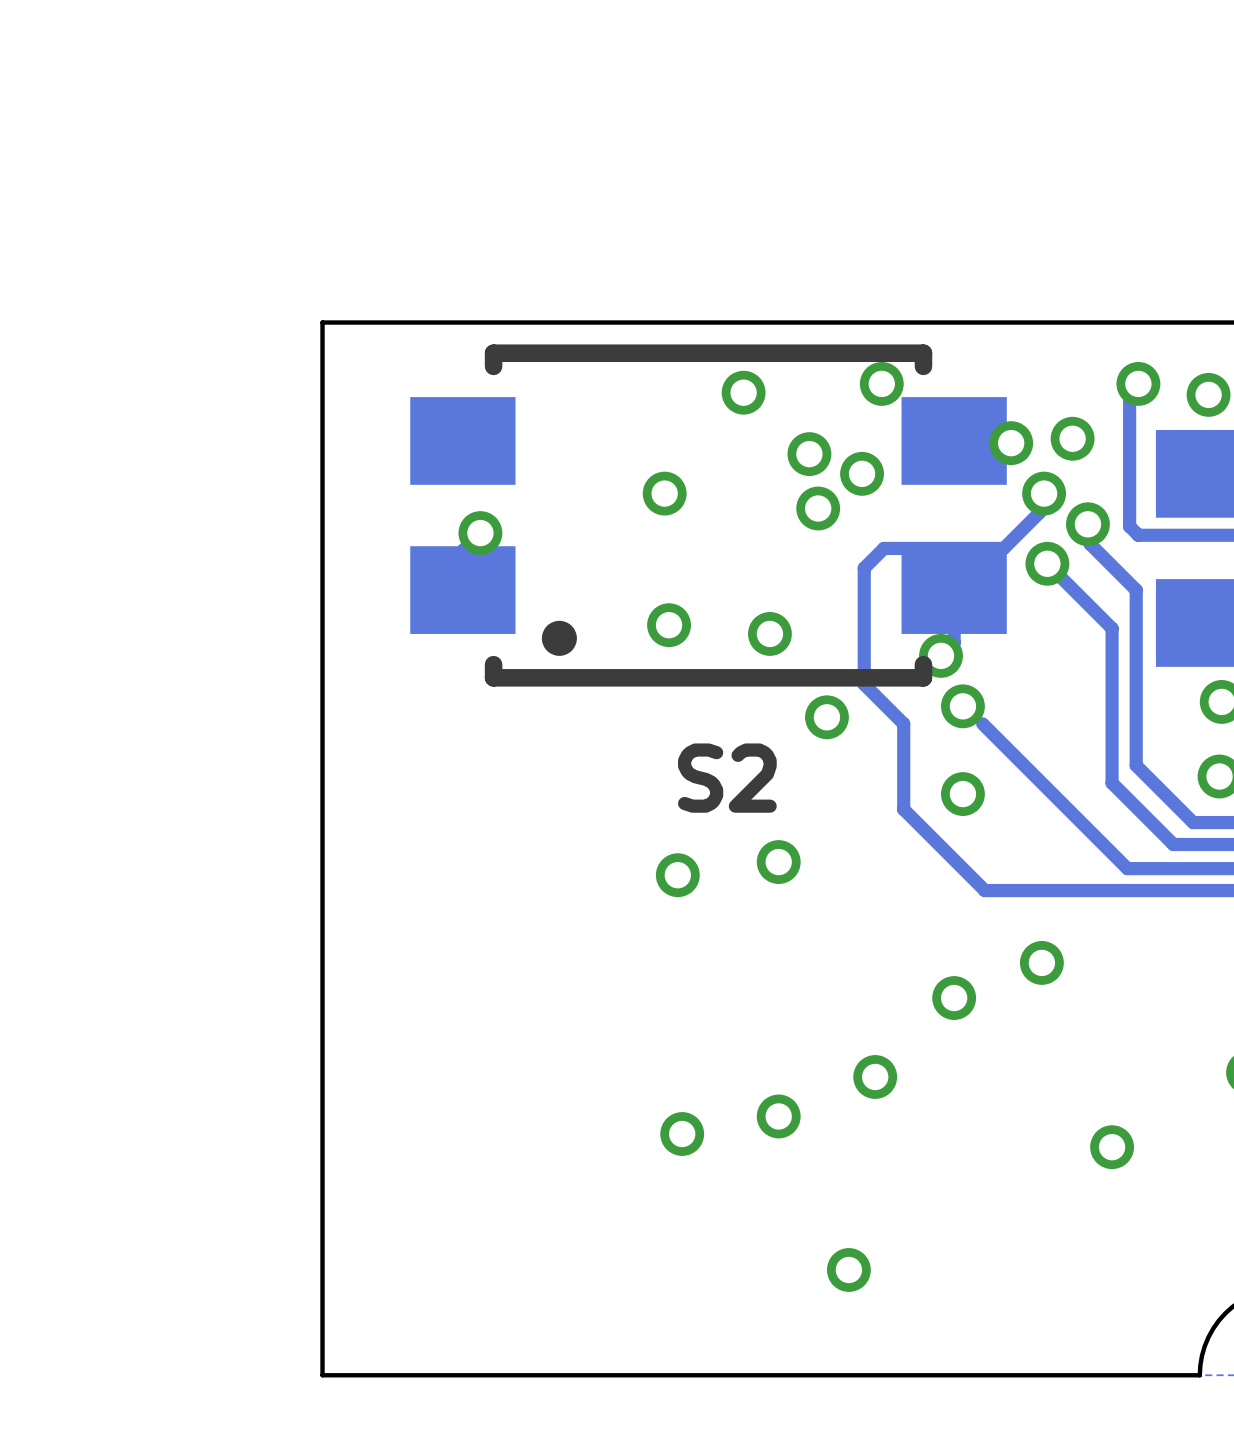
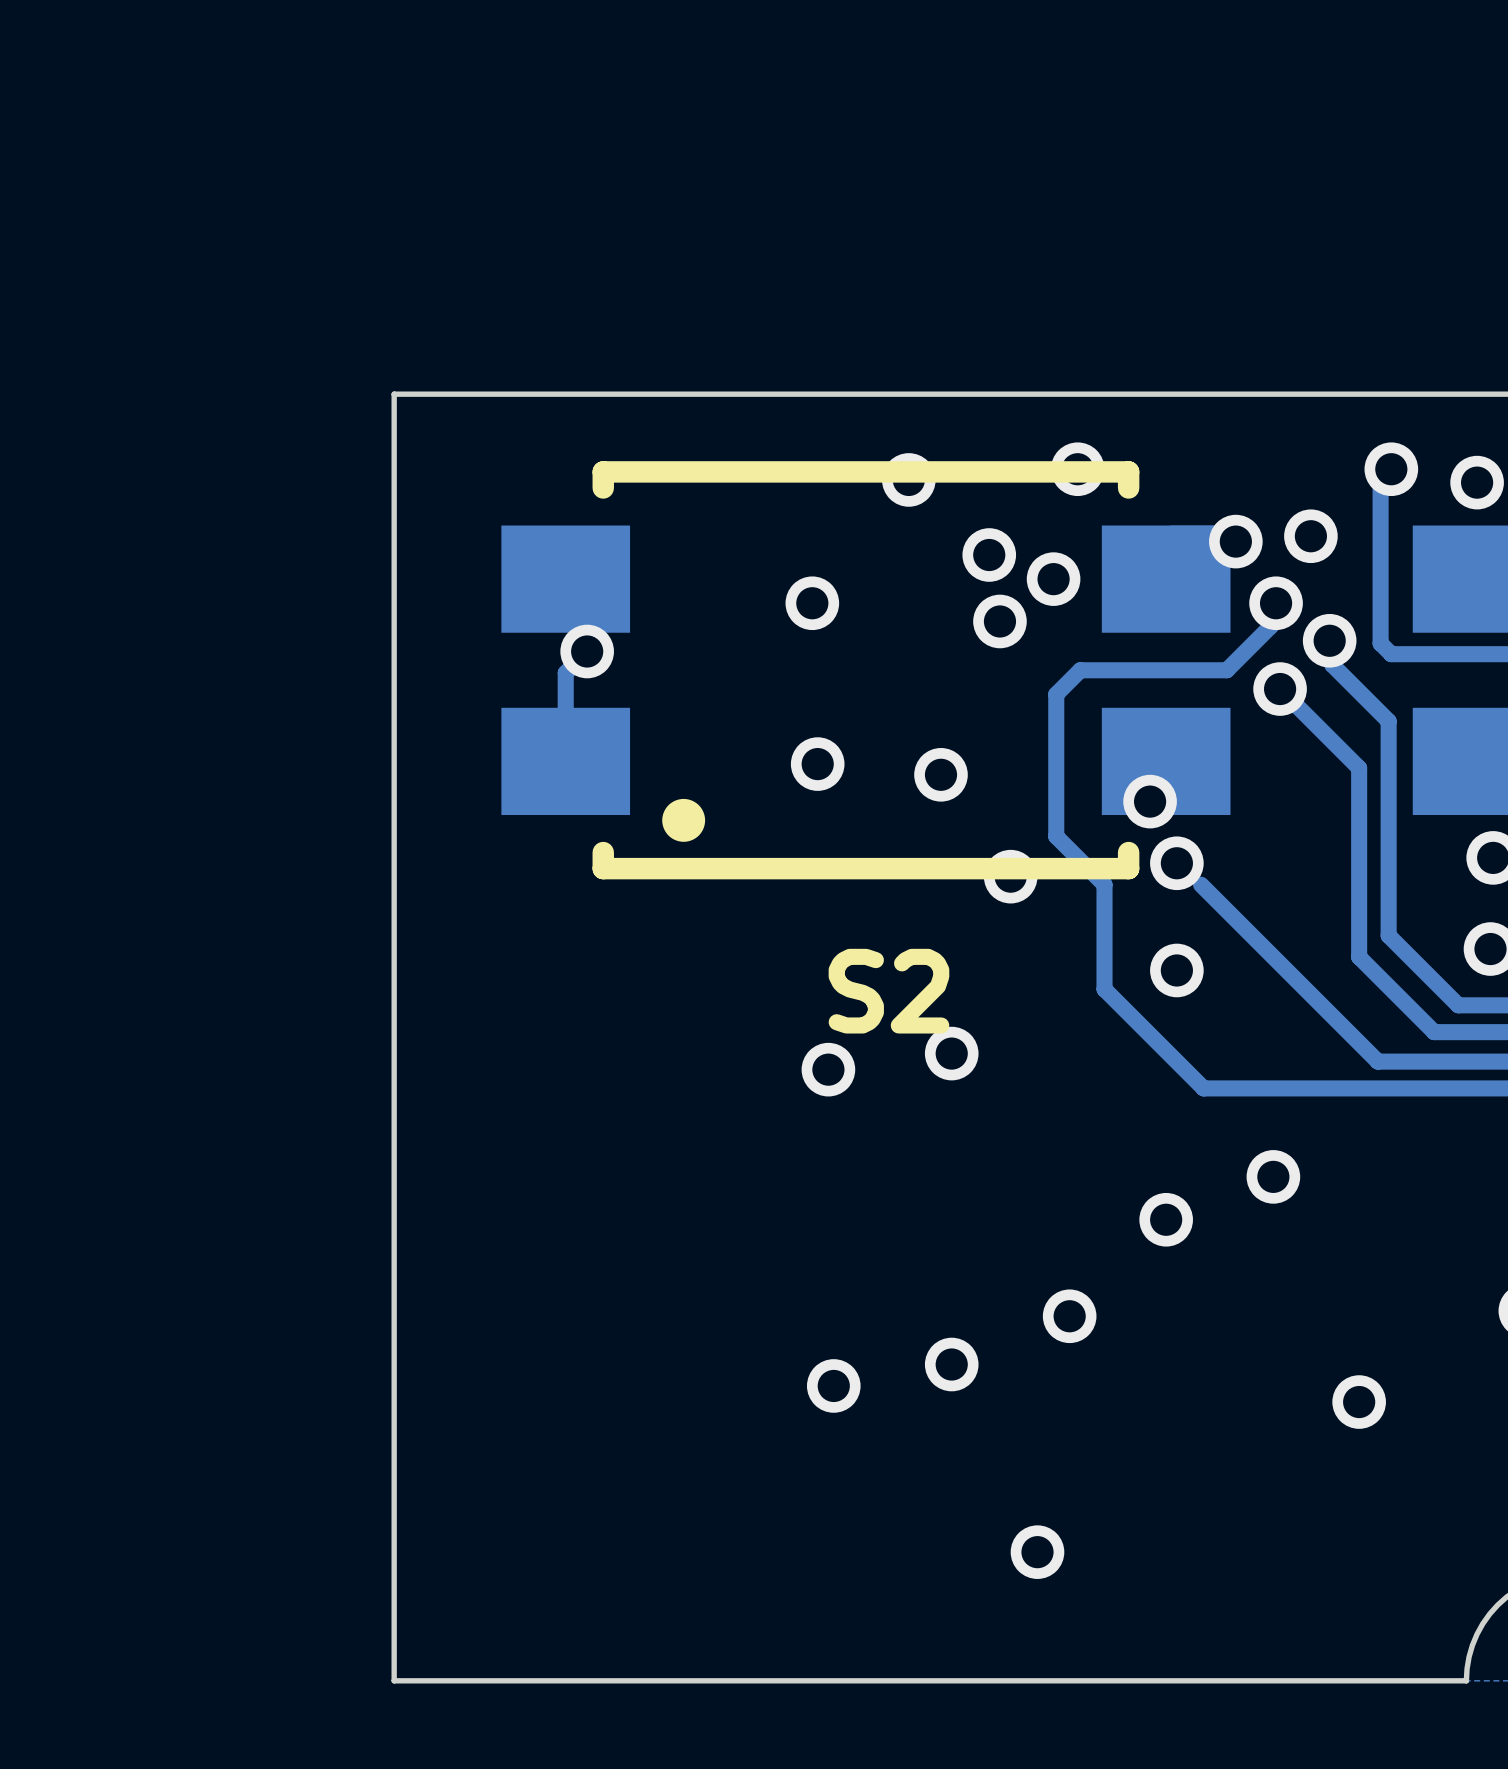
S2 position: (708, 515) -> (865, 670)

